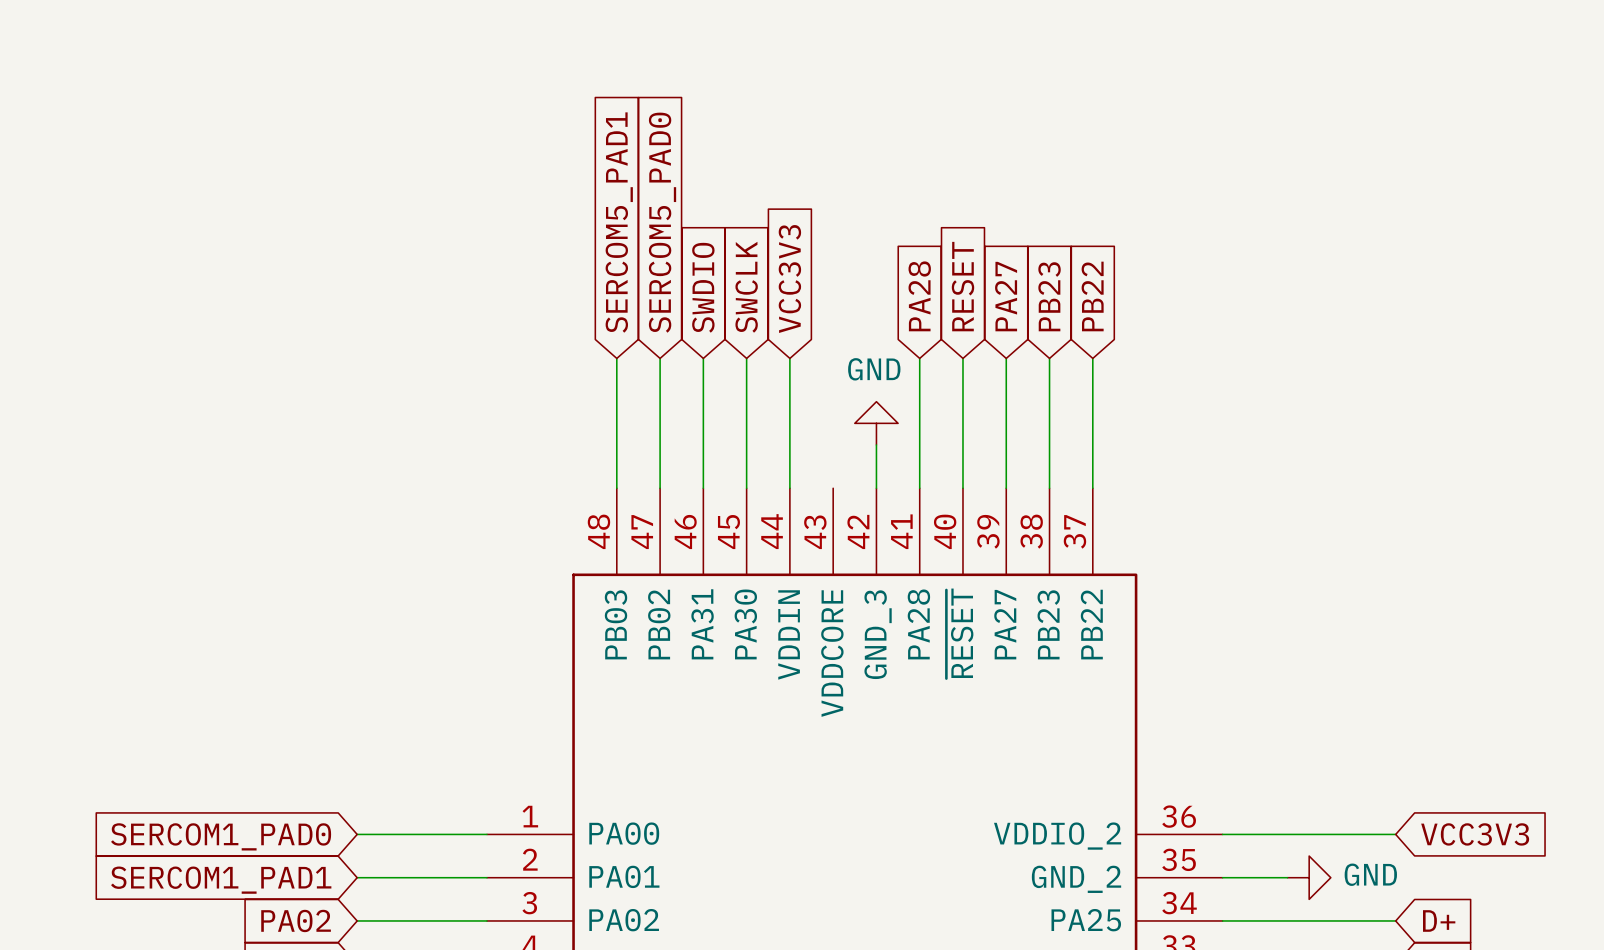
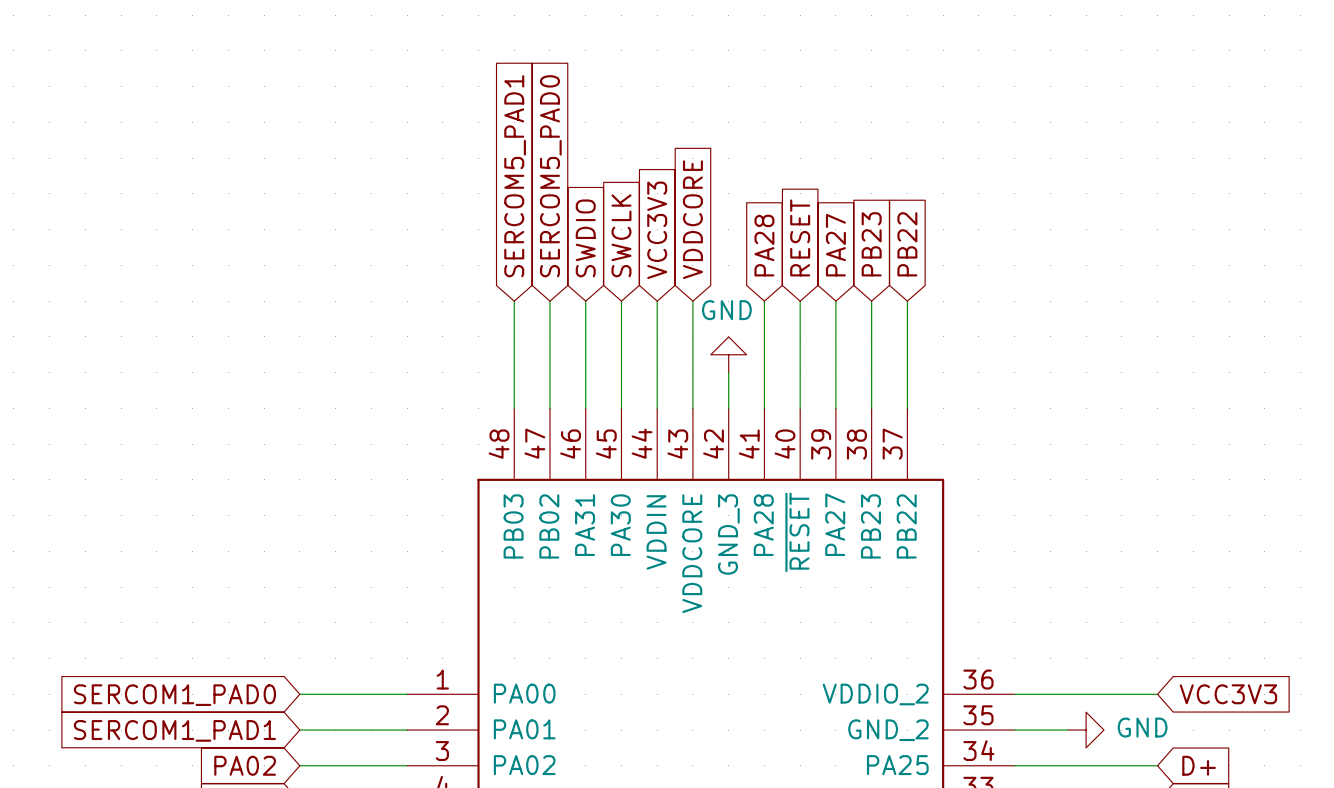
global label: none -> VDDCORE (692, 219)
wire: none -> (692, 301) (692, 408)

